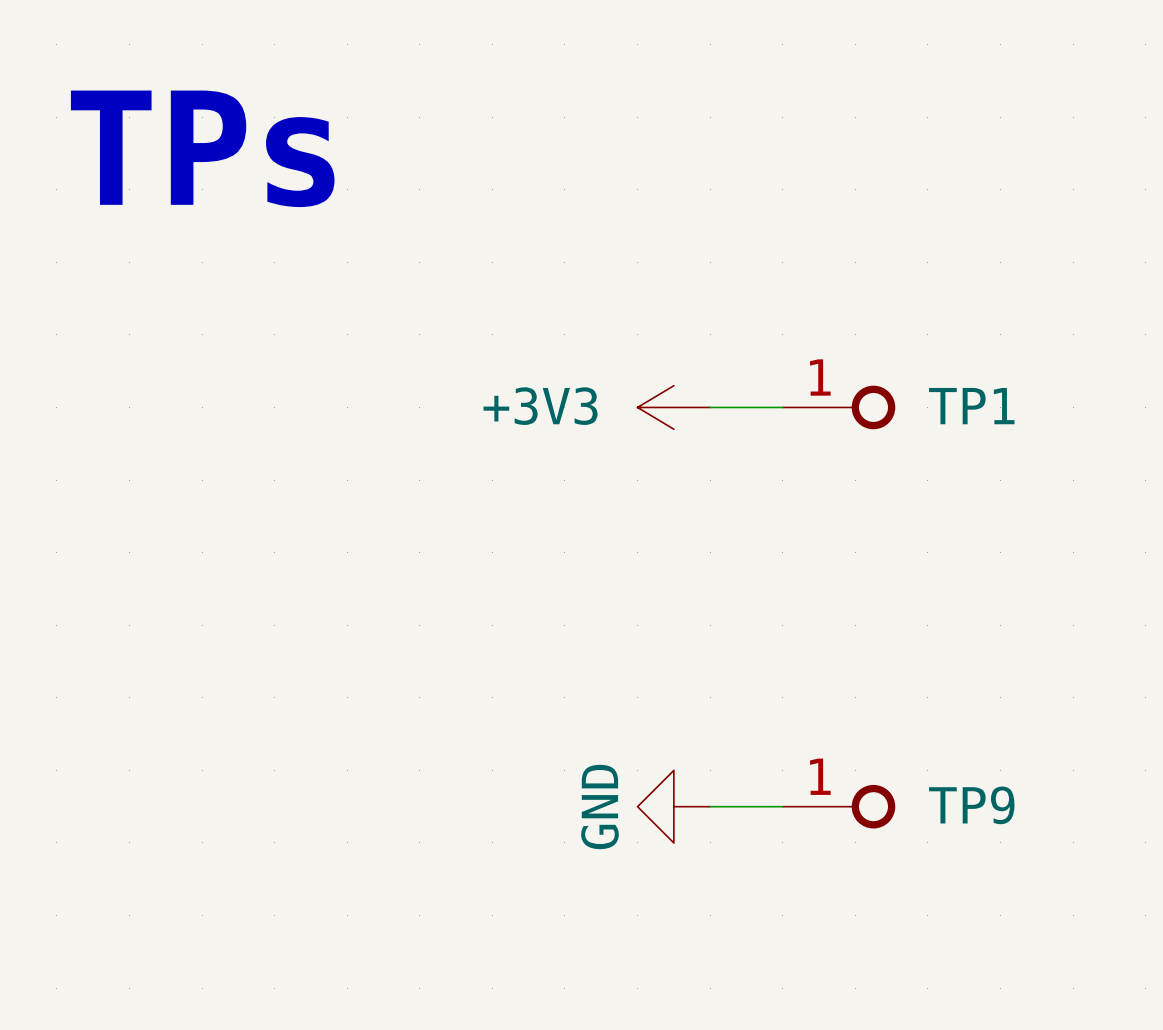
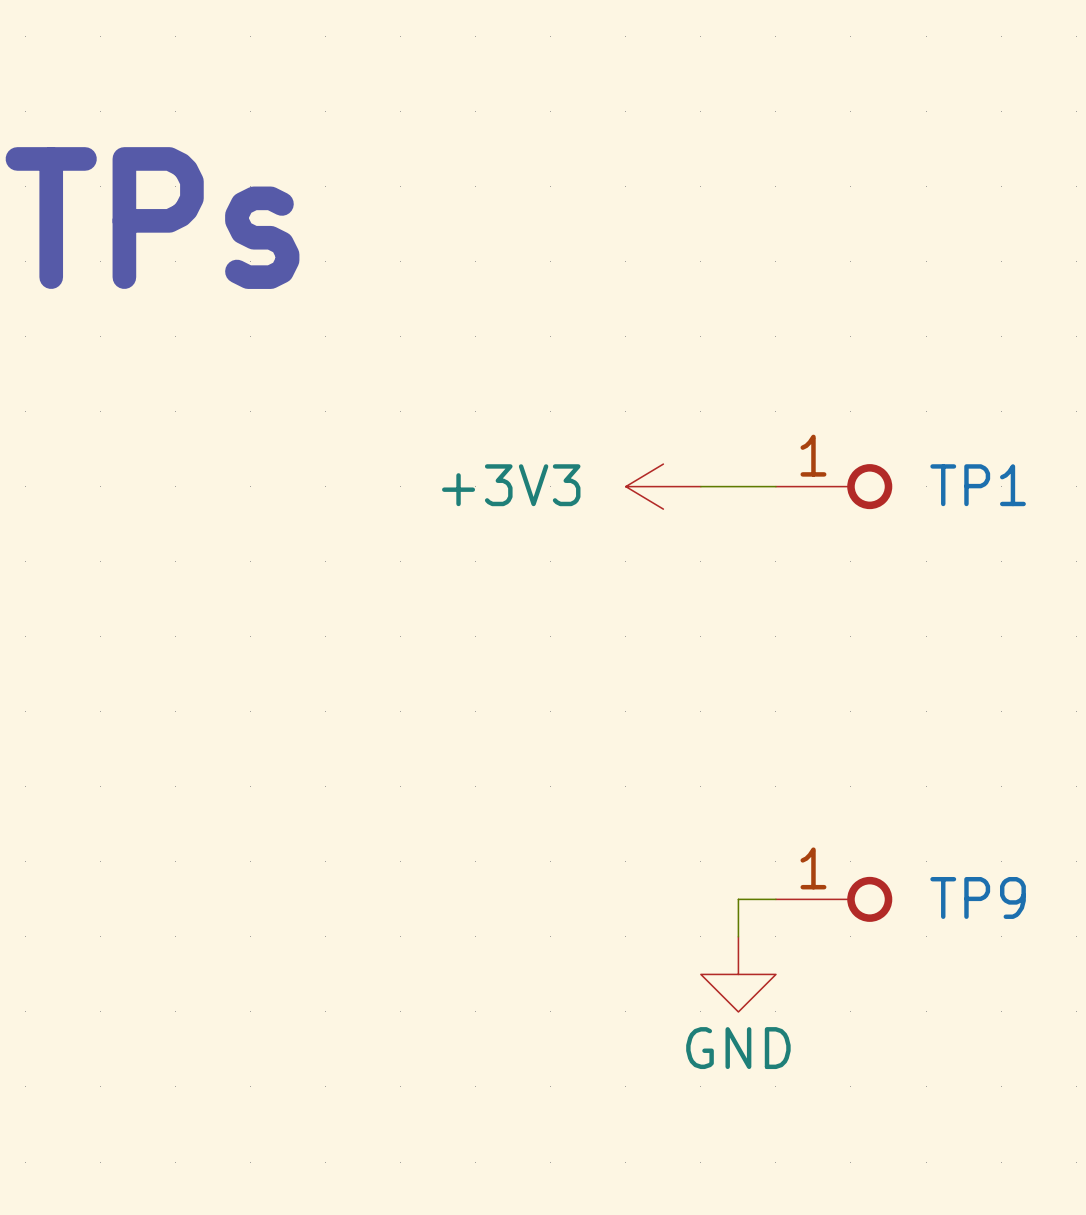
power symbol rotation: 0° (673, 806) -> 90° counterclockwise (738, 974)
power symbol position: GND (673, 806) -> GND (738, 974)
wire: (710, 806) (746, 806) -> (738, 936) (738, 899)

